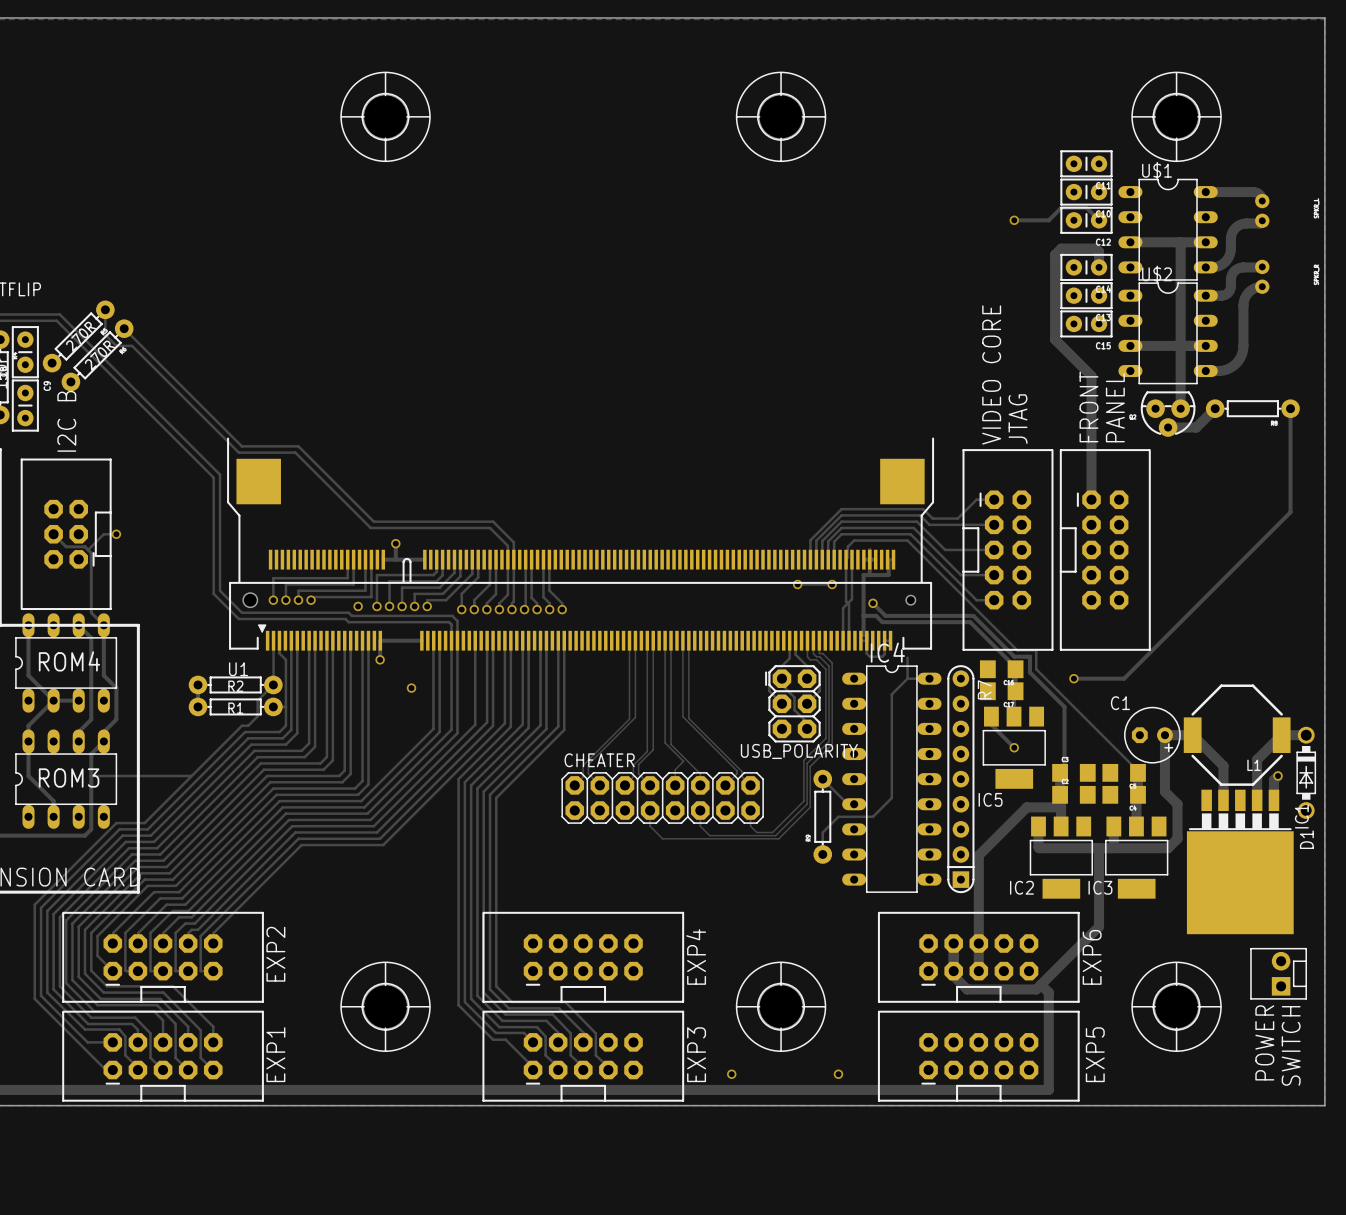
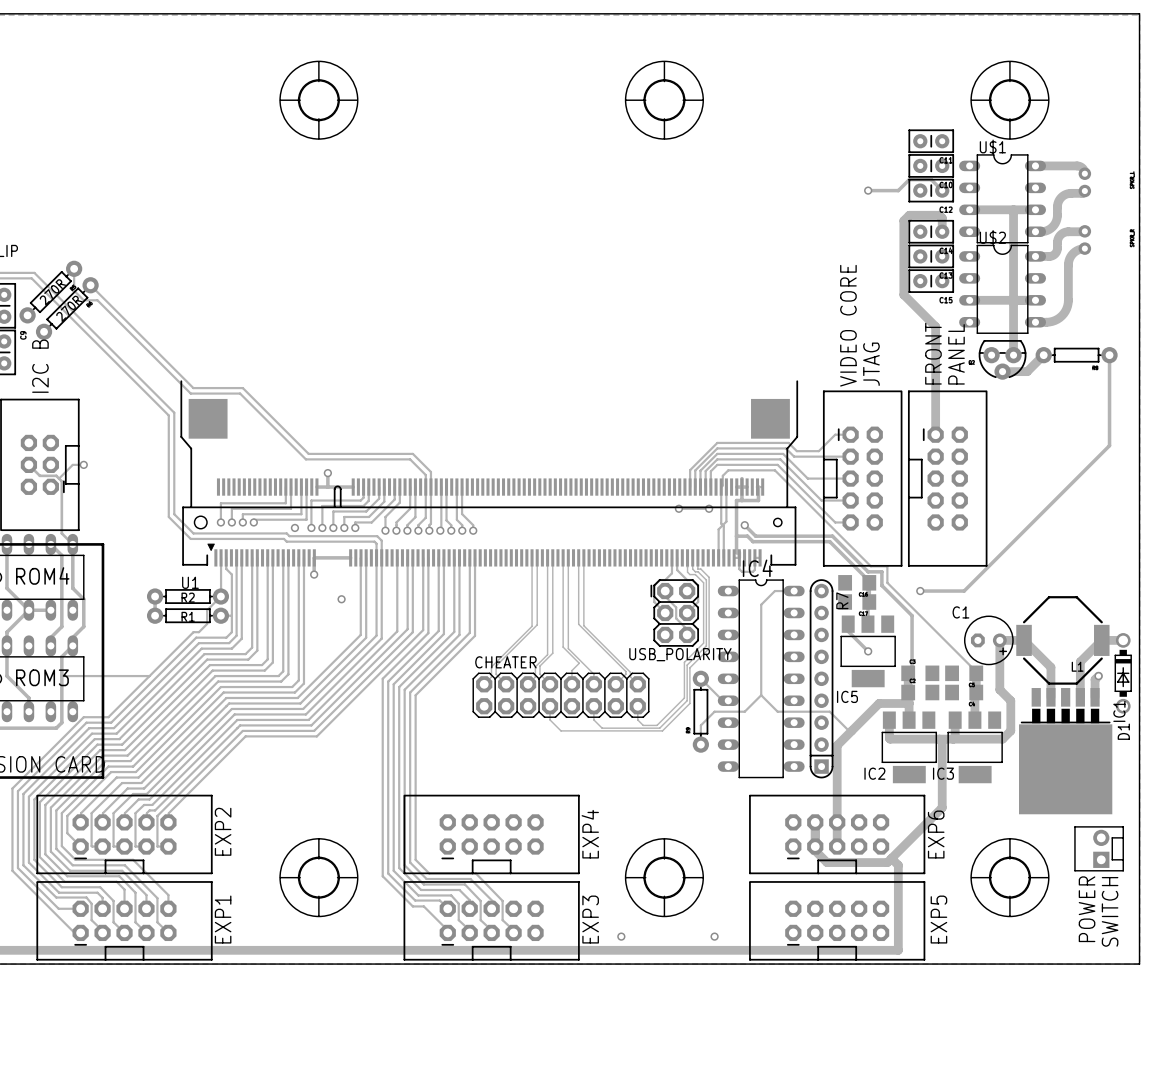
track: (907, 657) (907, 678) -> none
track: none -> (761, 695) (777, 711) (829, 711) (848, 730) (851, 730)

